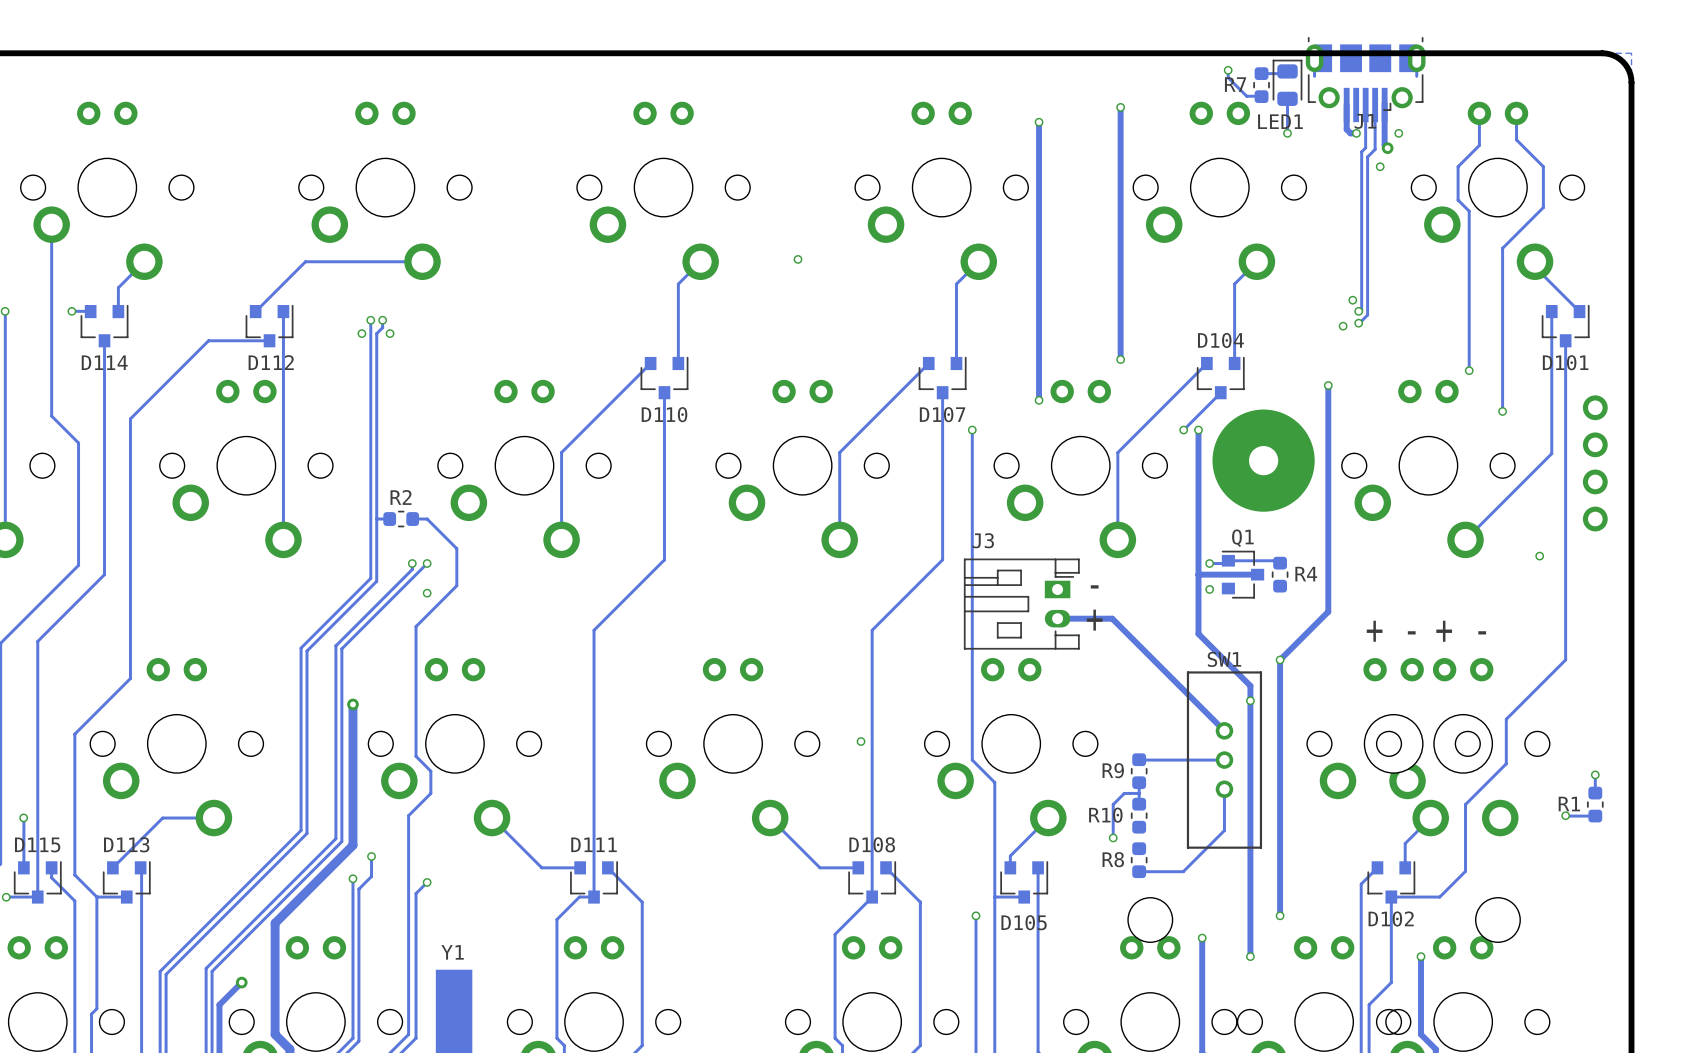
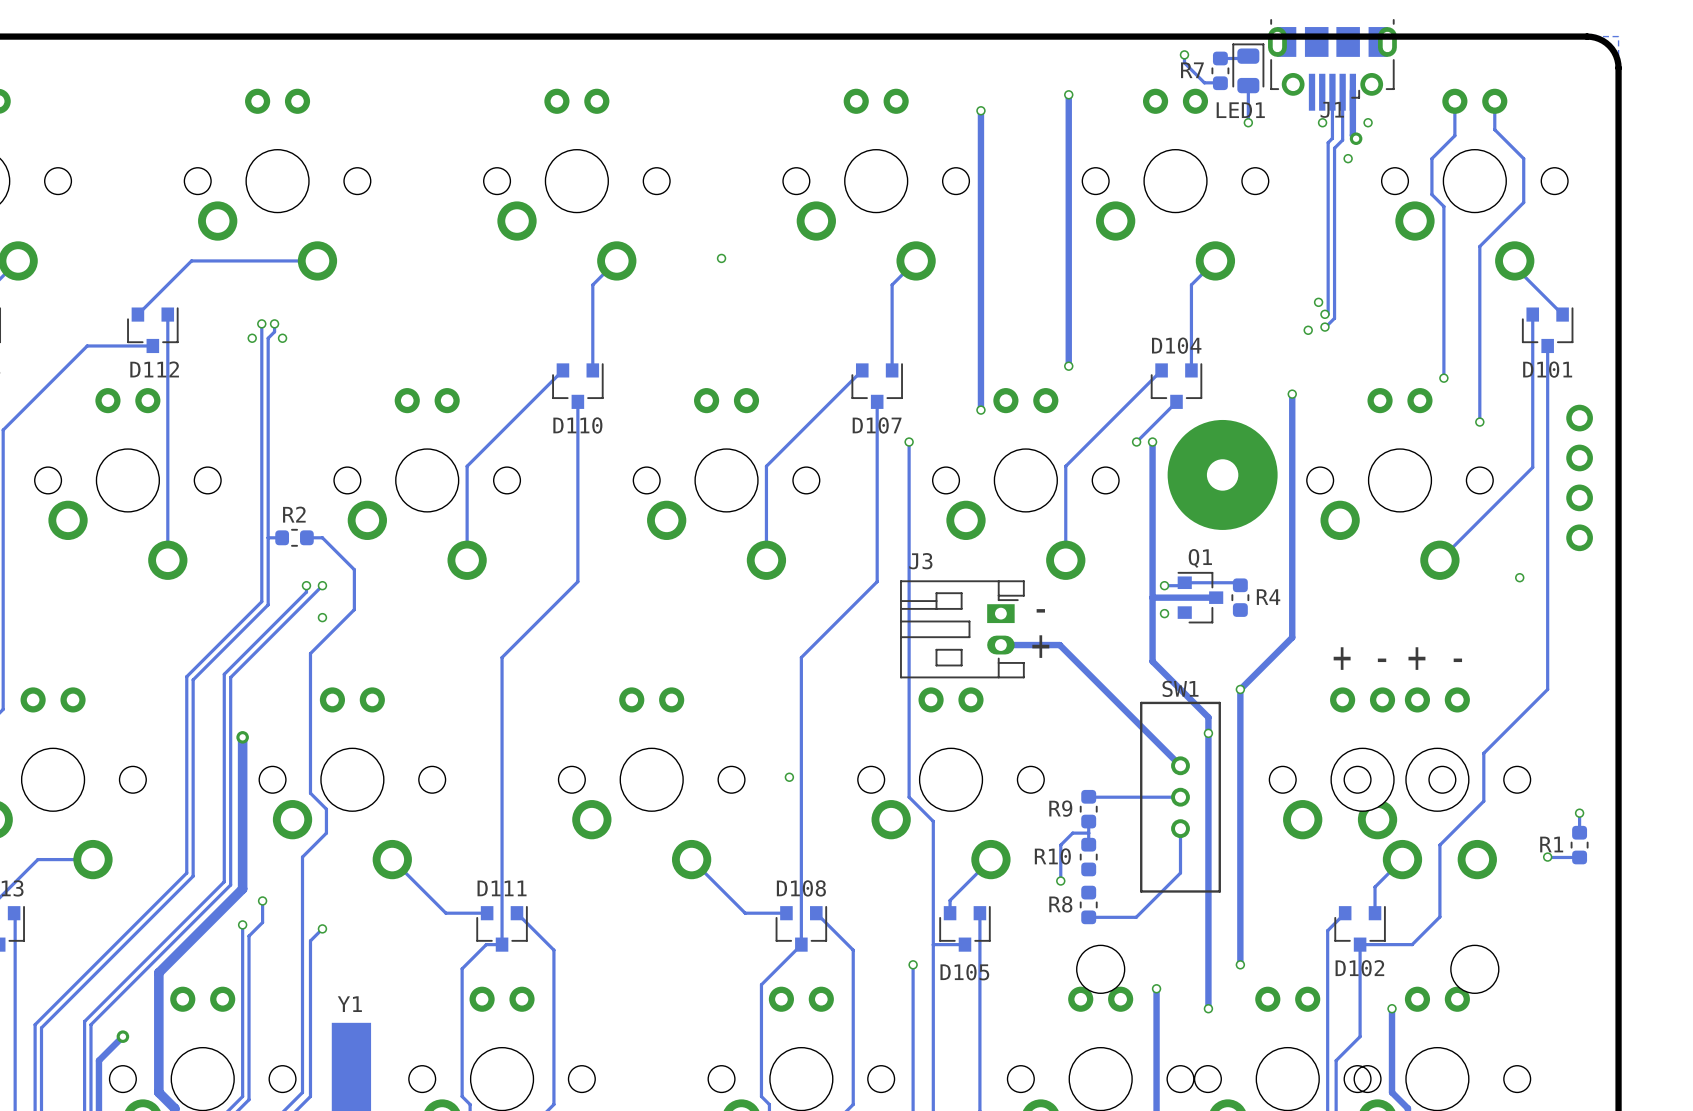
track: (1314, 70) (1314, 76) -> none
track: (1416, 71) (1416, 76) -> none
track: (1346, 104) (1346, 129) (1350, 133) (1356, 133) -> none

